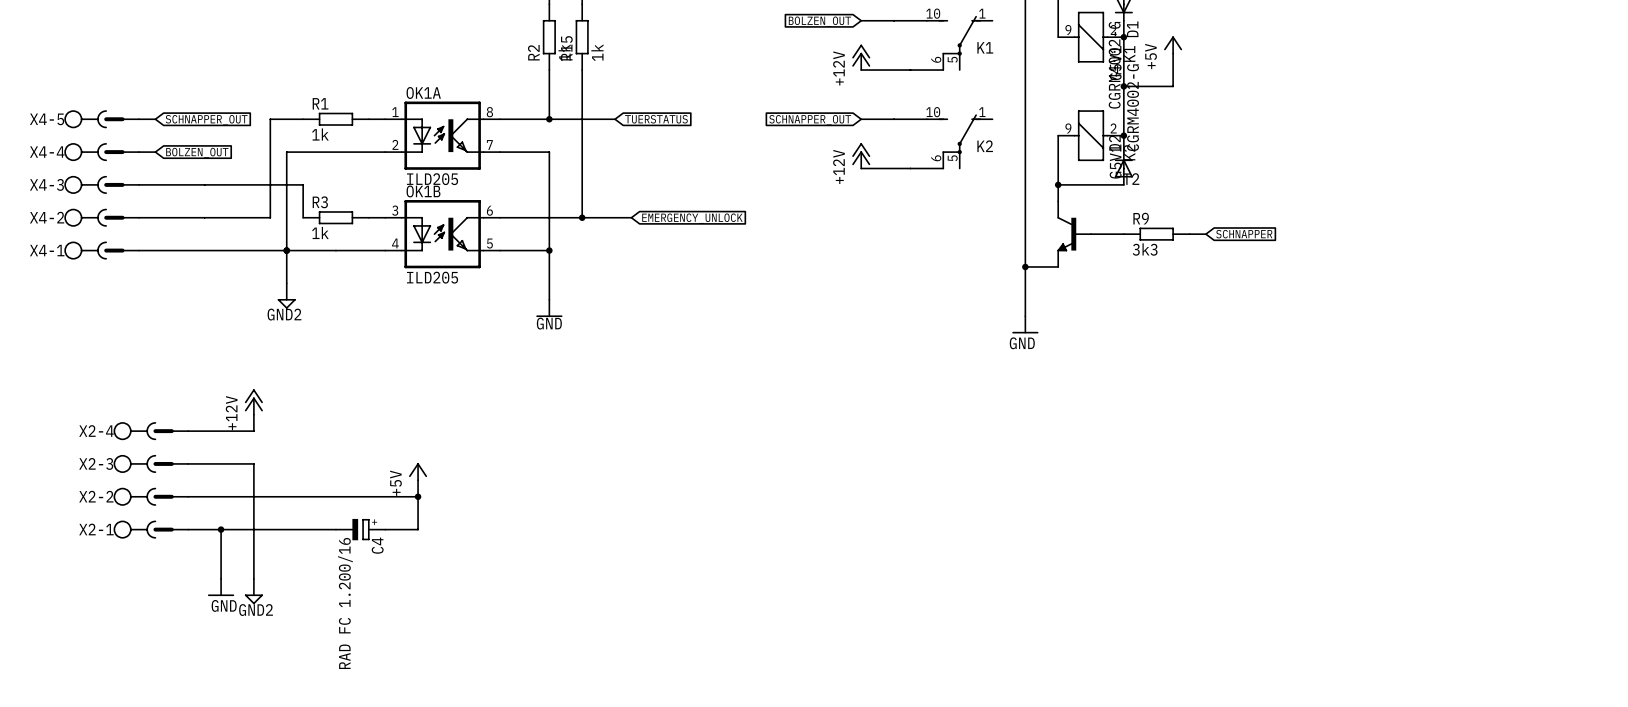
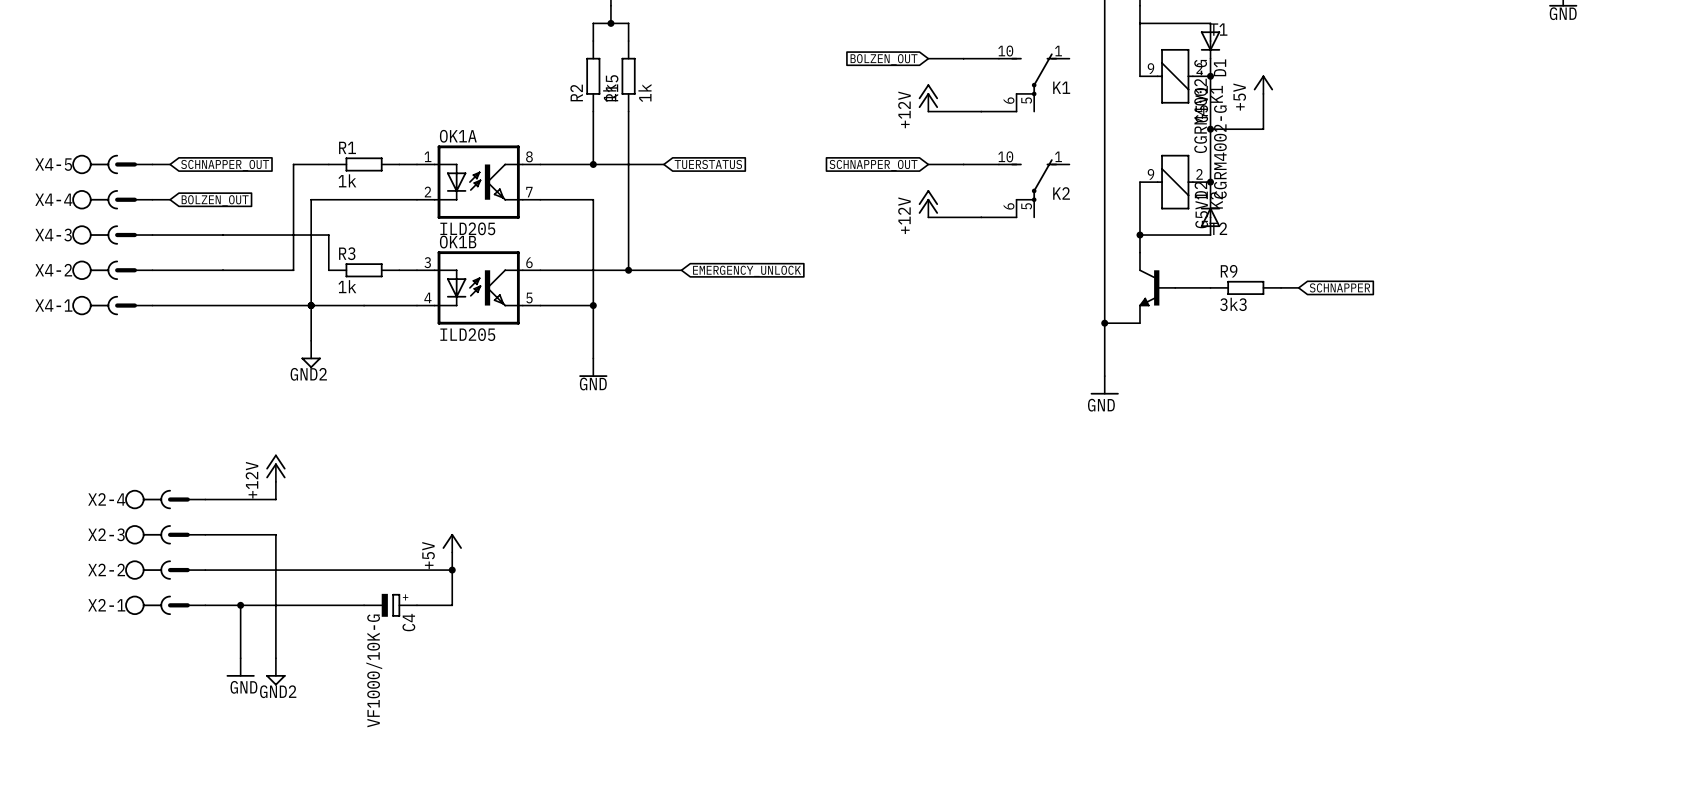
C4 value: RAD FC 1.200/16 (345, 603) -> VF1000/10K-G (374, 670)

